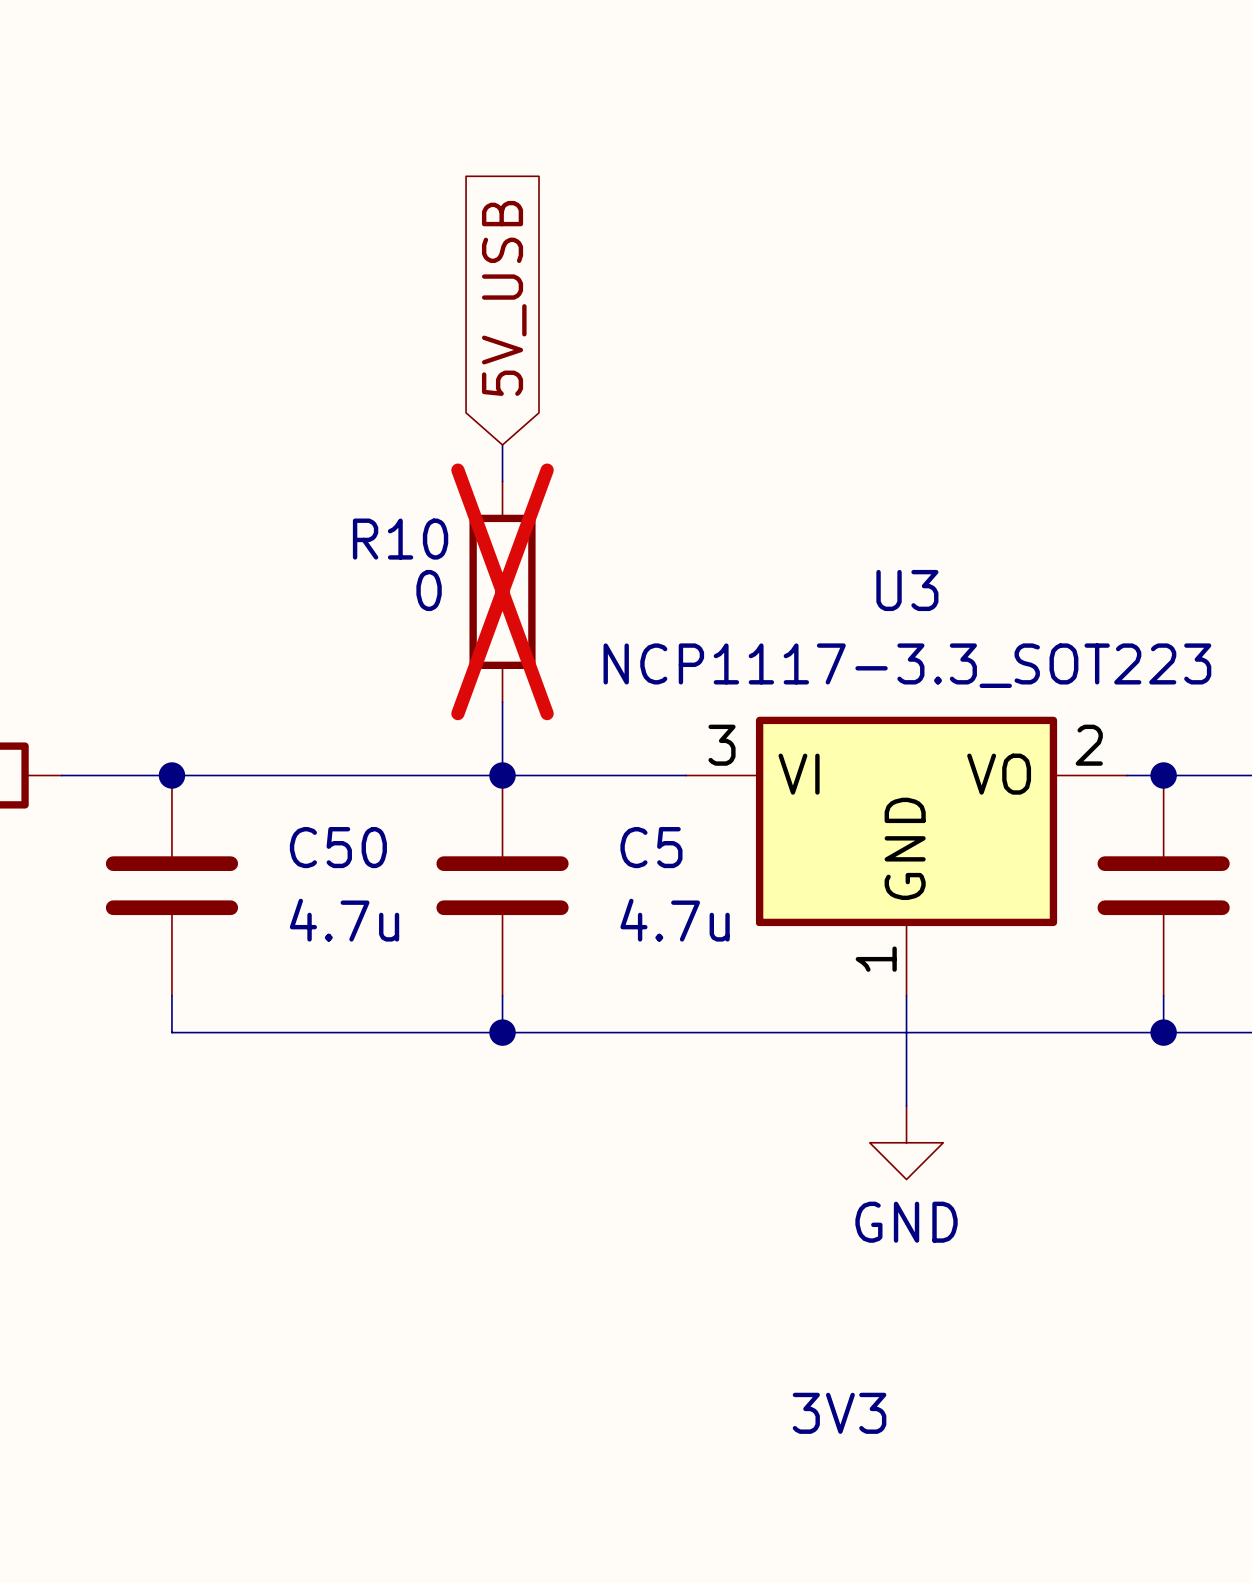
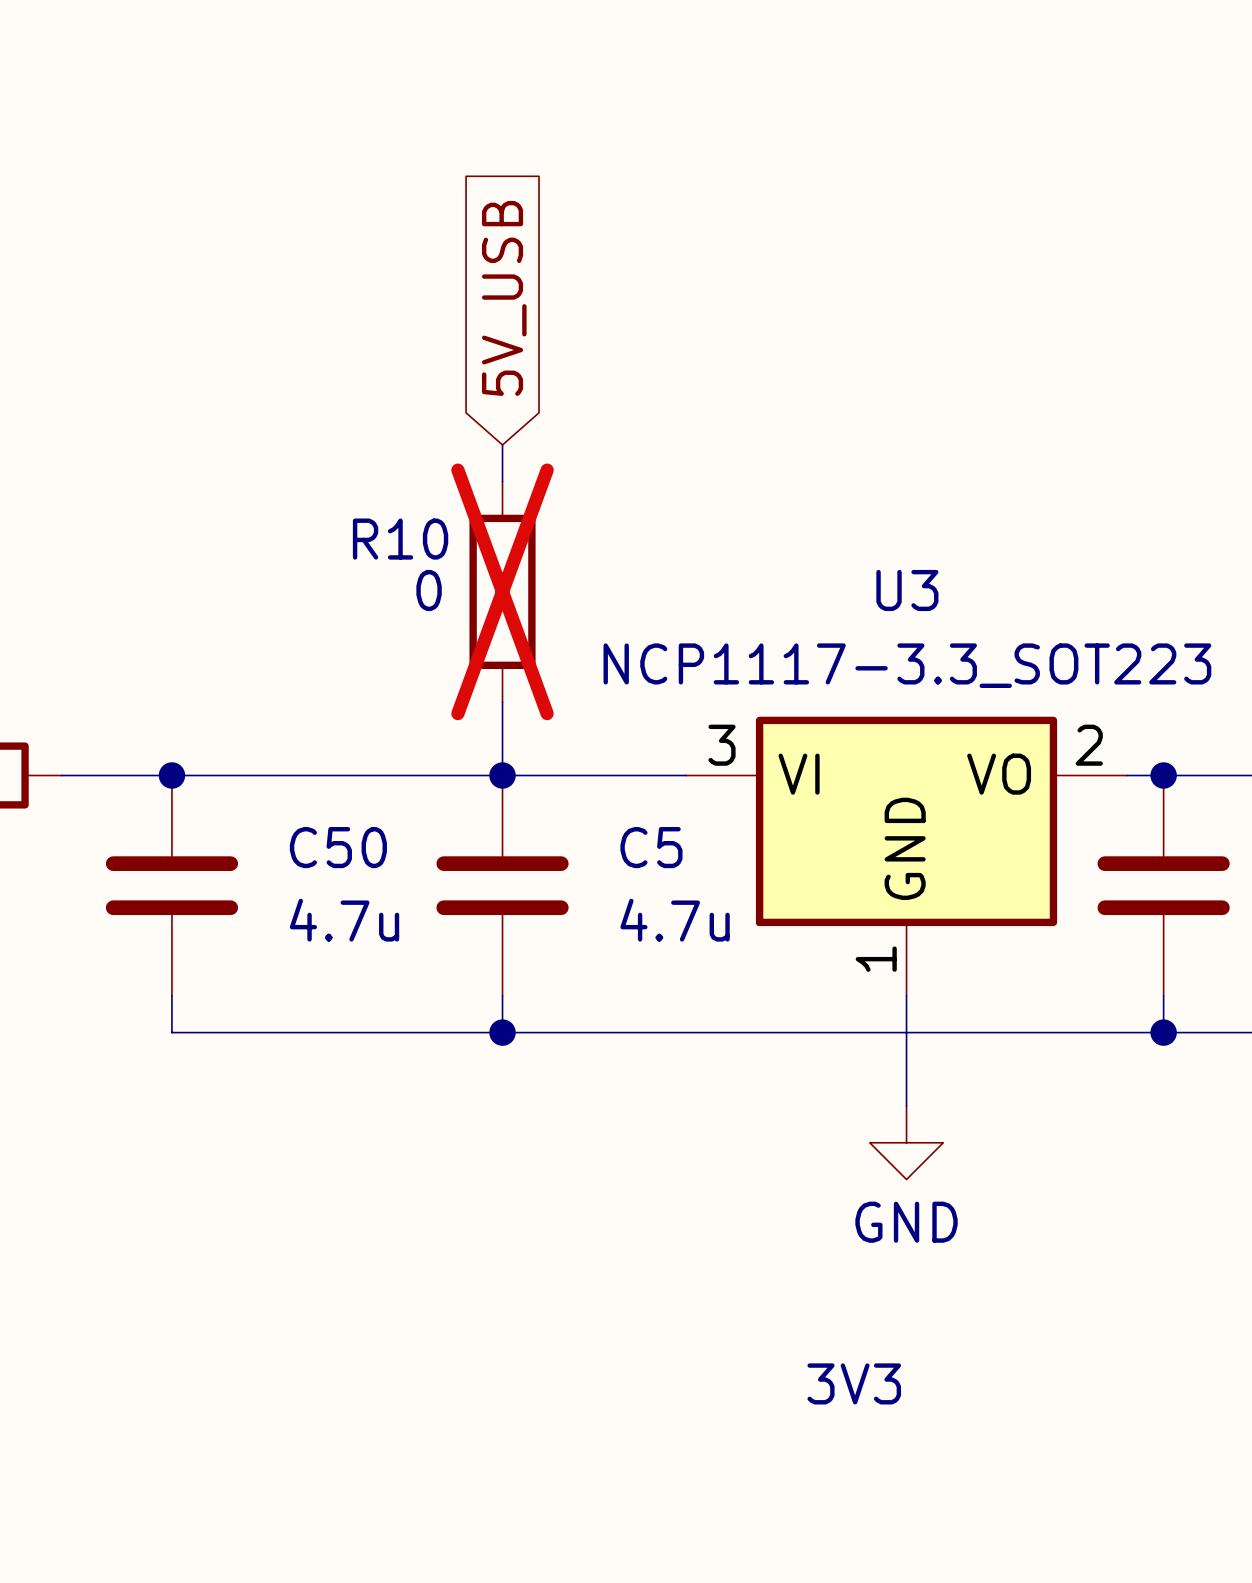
text position: 3V3 (839, 1413) -> 3V3 (854, 1383)

